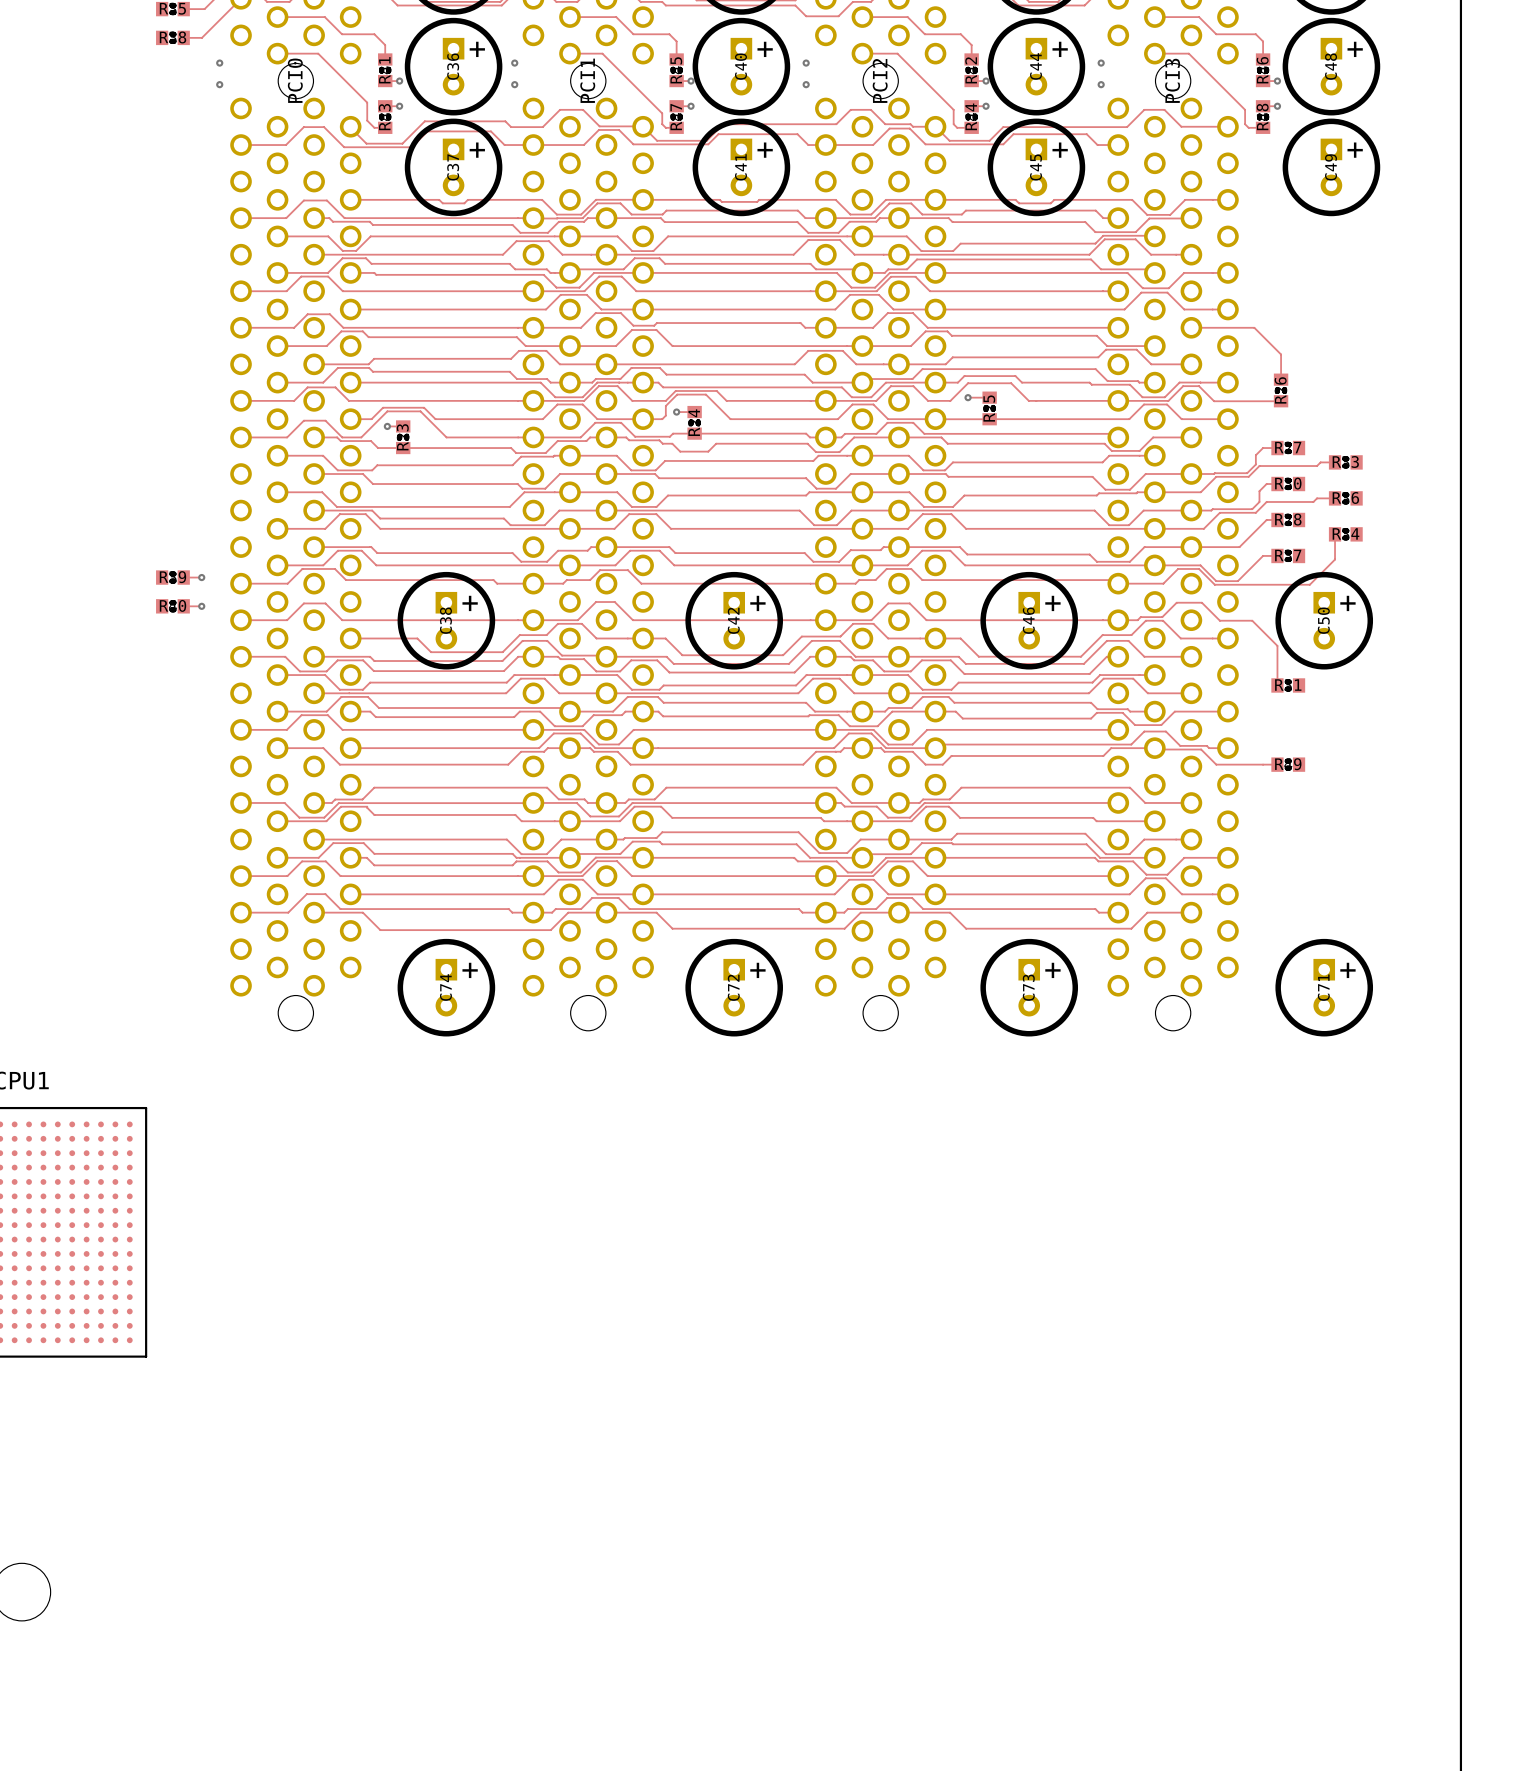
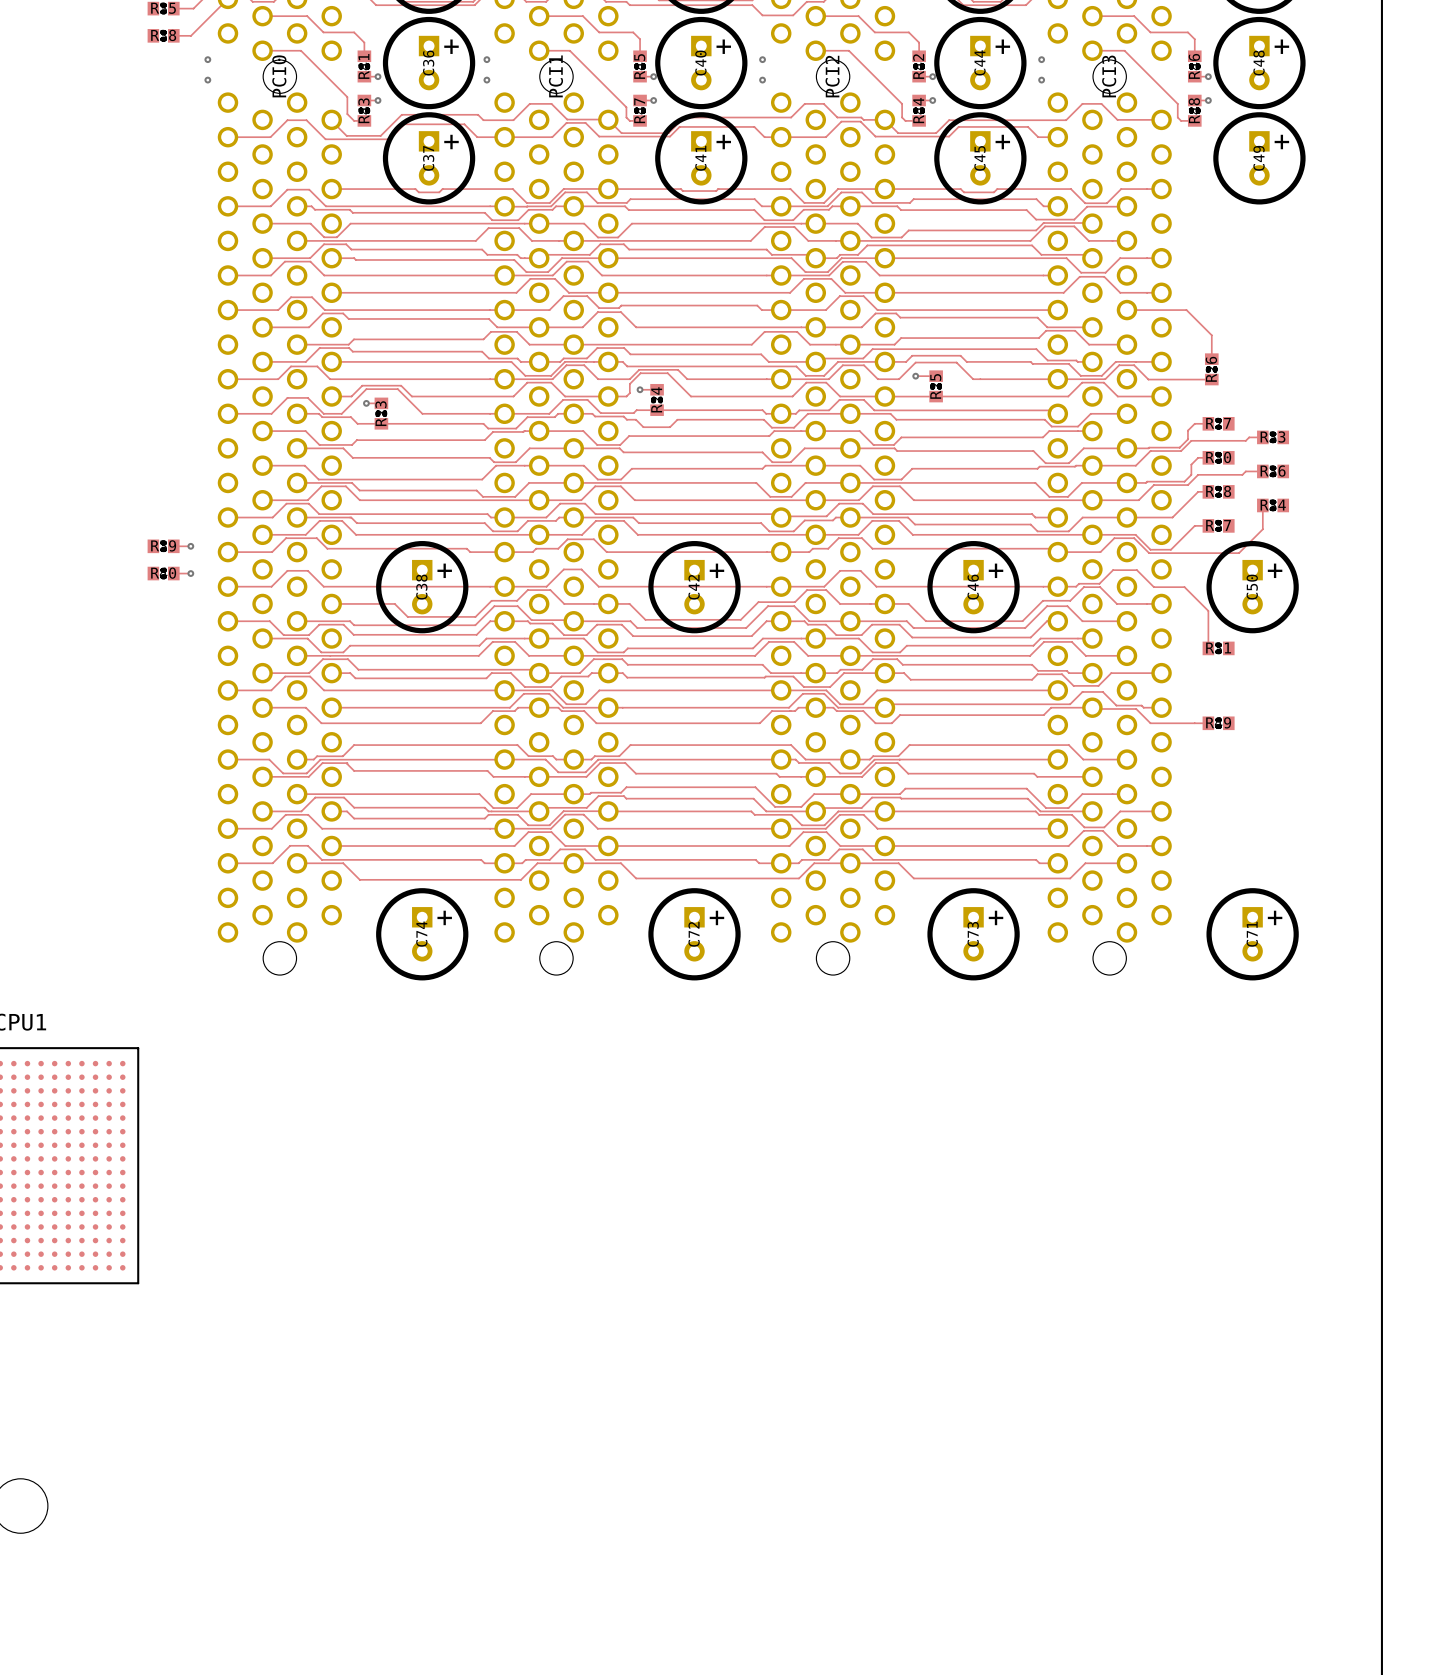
track: none -> (227, 517) (272, 517) (286, 503) (308, 503) (319, 514) (487, 514) (490, 517) (546, 517) (560, 503) (585, 503) (595, 514) (777, 514) (781, 517) (826, 516) (839, 503) (862, 503) (873, 514) (1032, 514) (1035, 517) (1057, 517)

